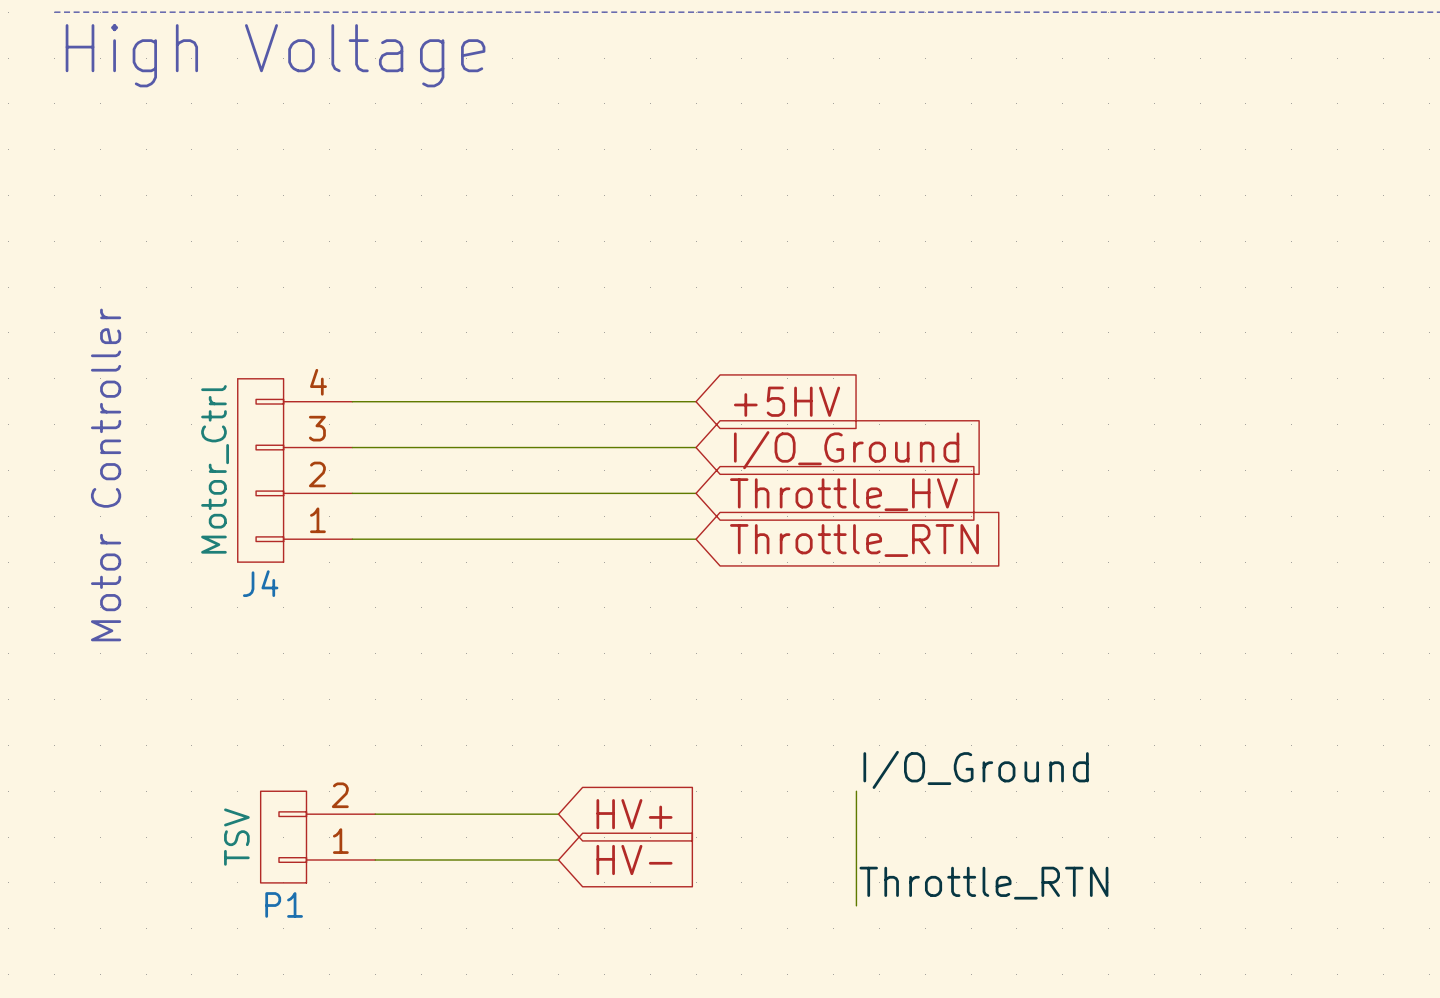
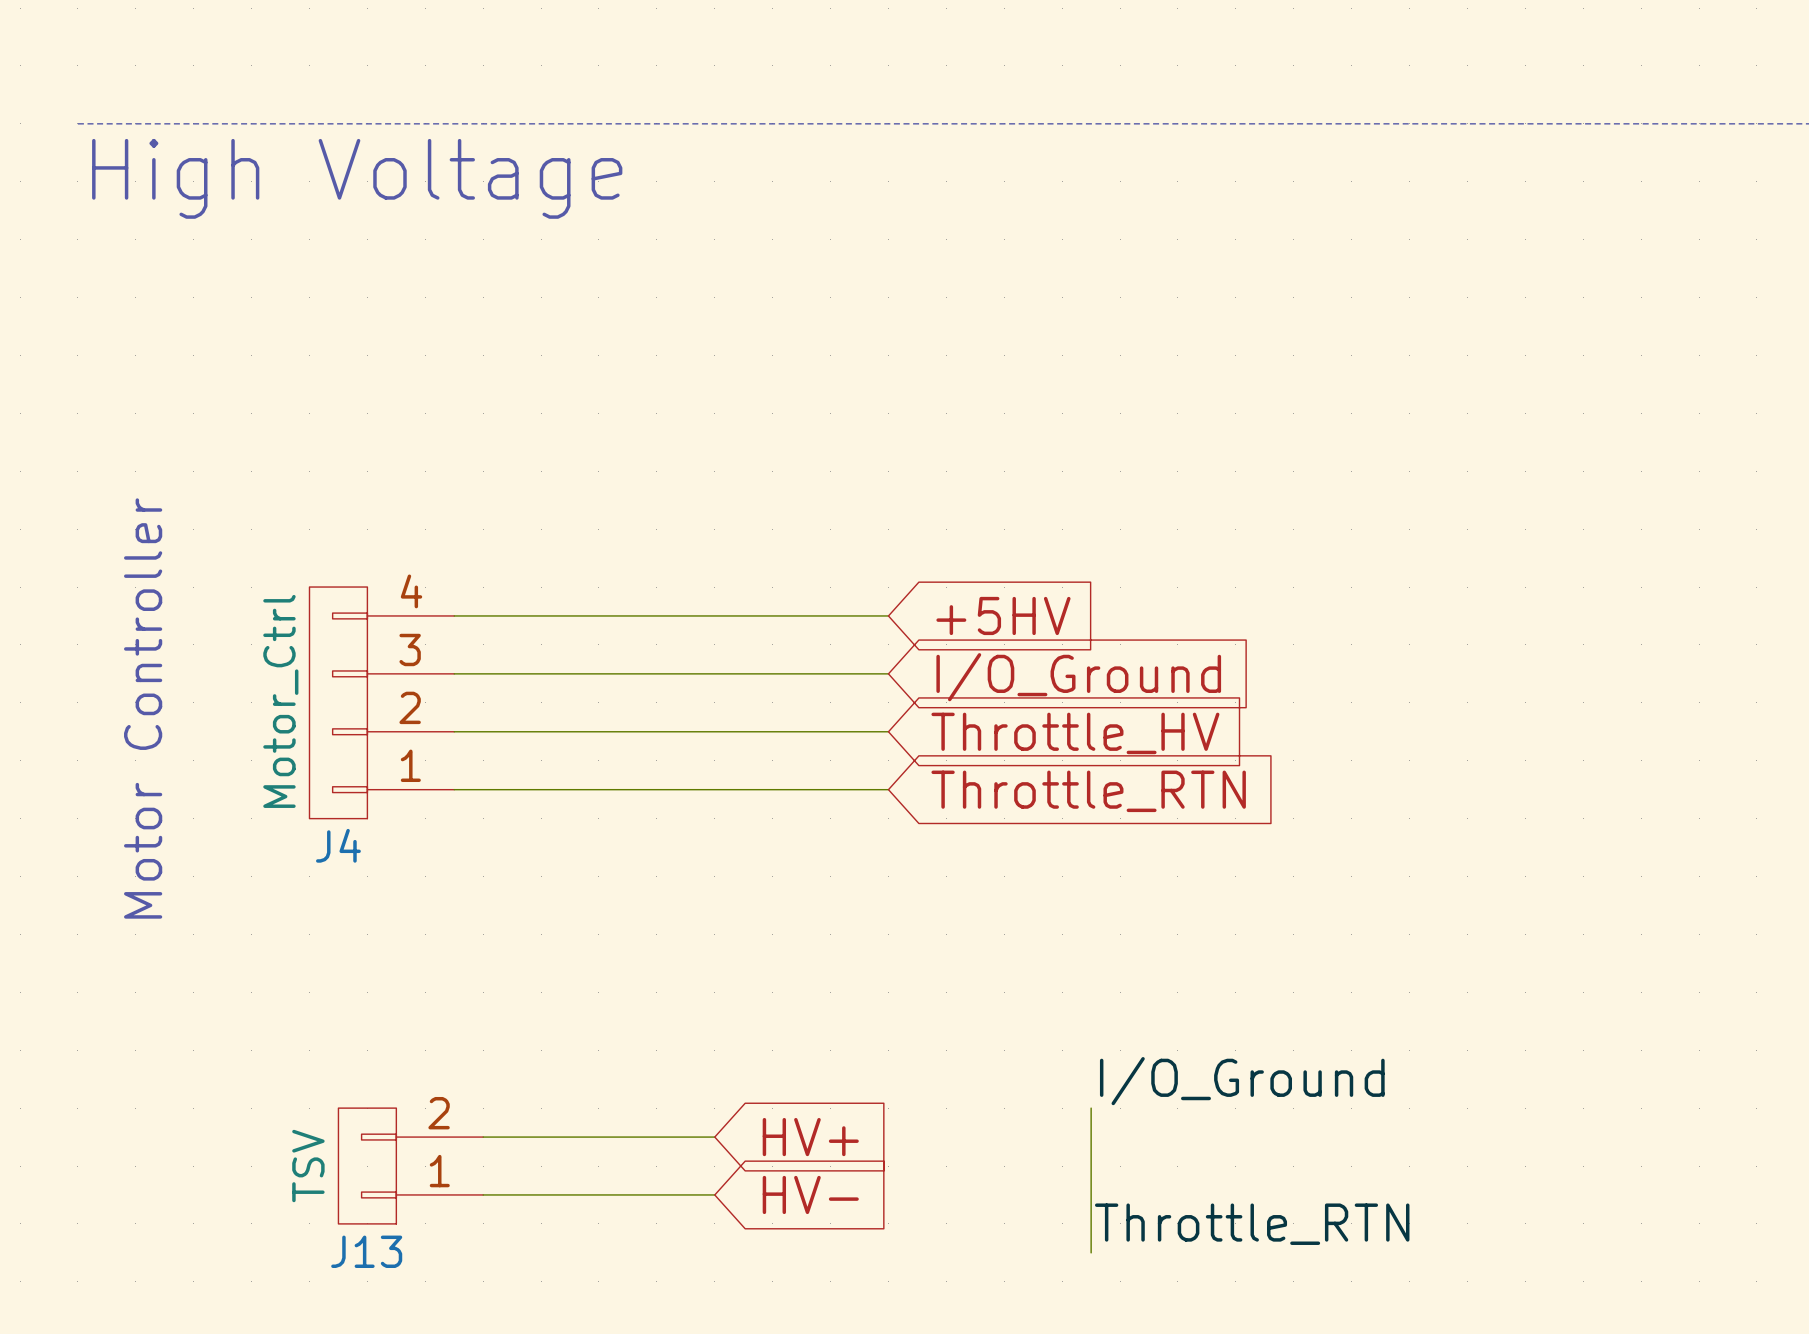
P1 name: P1 (284, 904) -> J13 (366, 1251)

